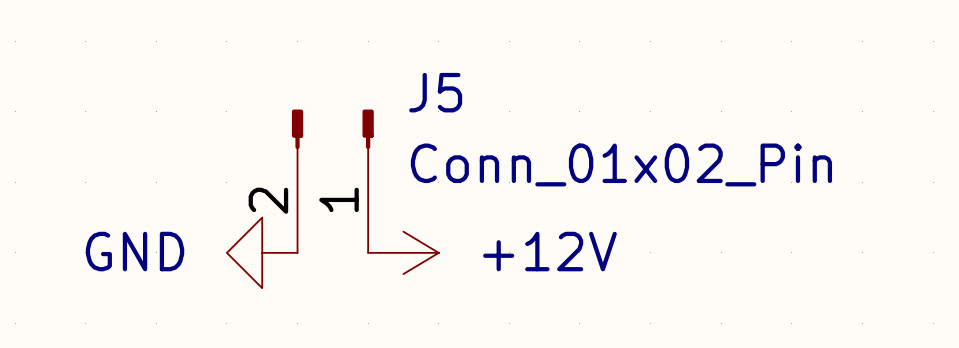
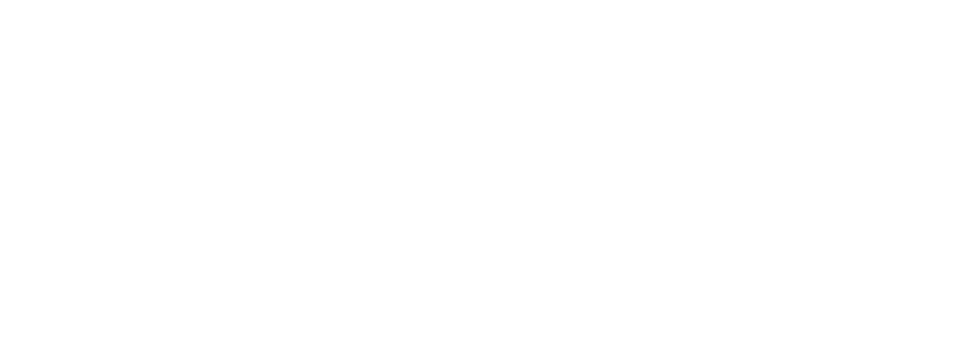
J5: Conn_01x02_Pin (332, 181) -> none
power symbol: GND (262, 252) -> none
power symbol: +12V (403, 252) -> none

